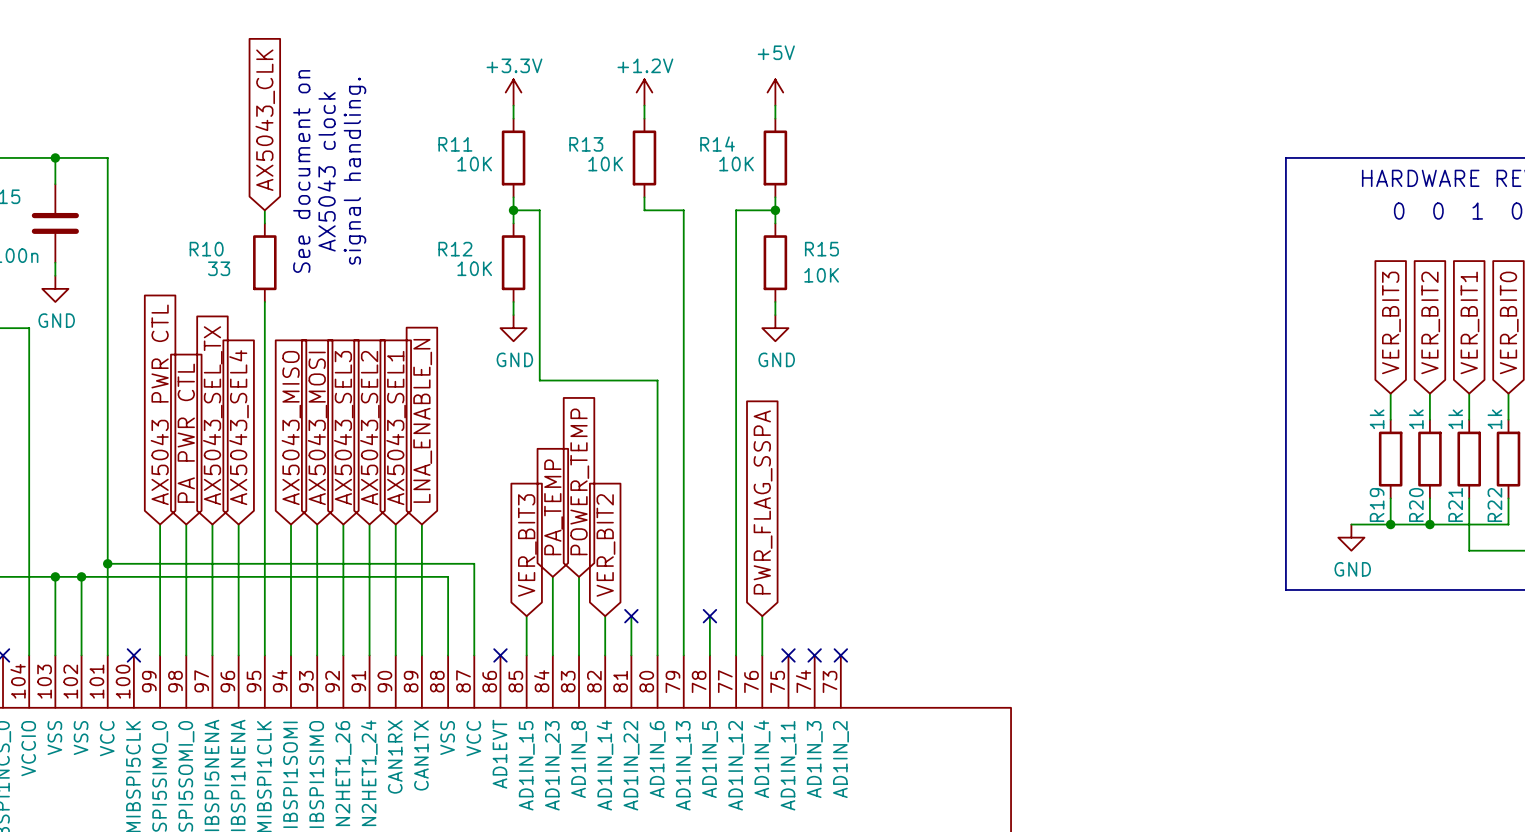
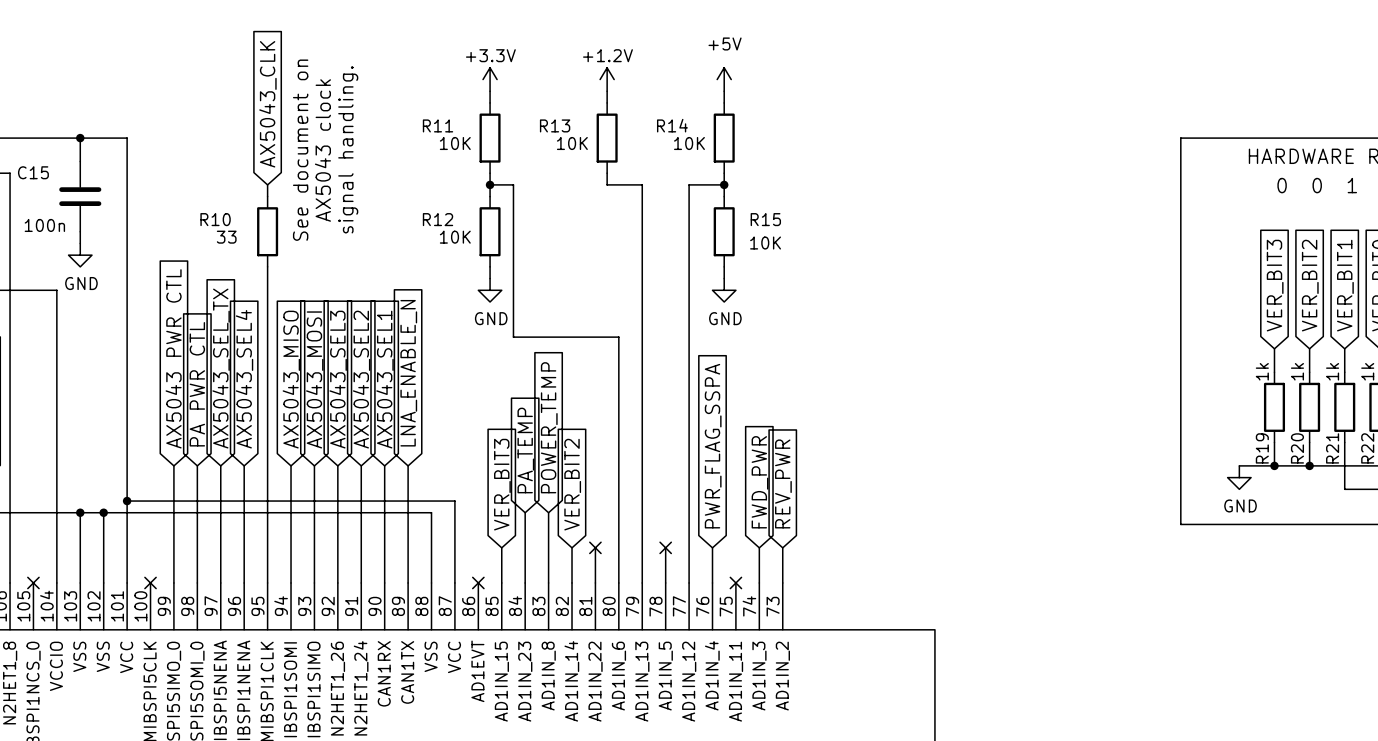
global label: none -> FWD_PWR (760, 482)
global label: none -> REV_PWR (783, 483)
wire: none -> (759, 547) (759, 582)
wire: none -> (782, 547) (782, 582)
no-connect mark: (814, 655) -> none
no-connect mark: (840, 655) -> none

